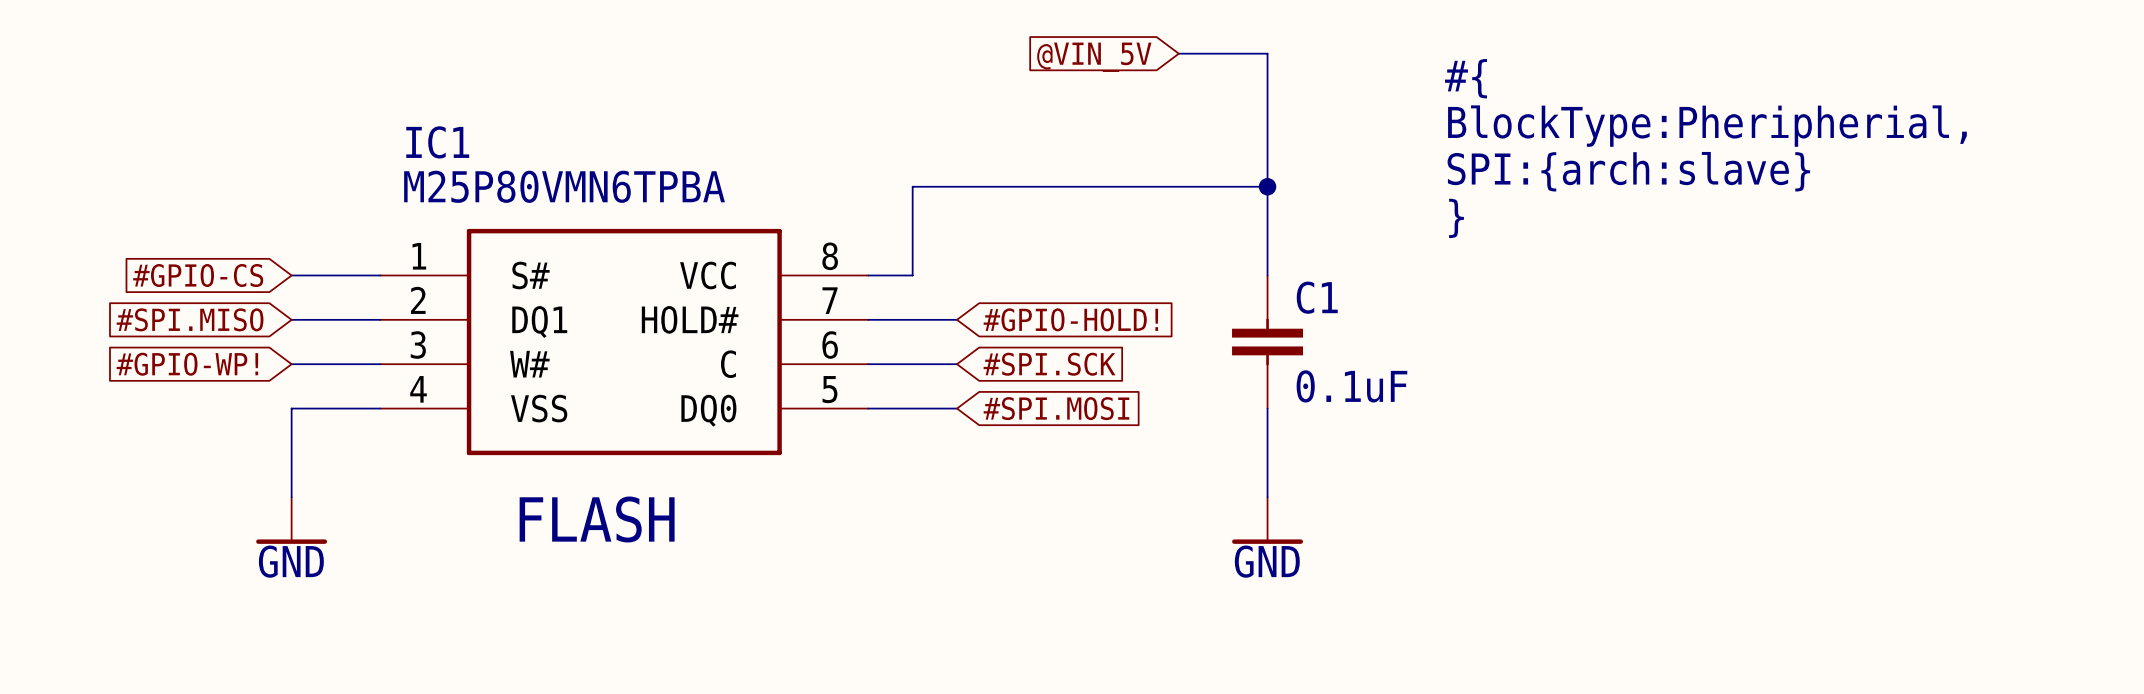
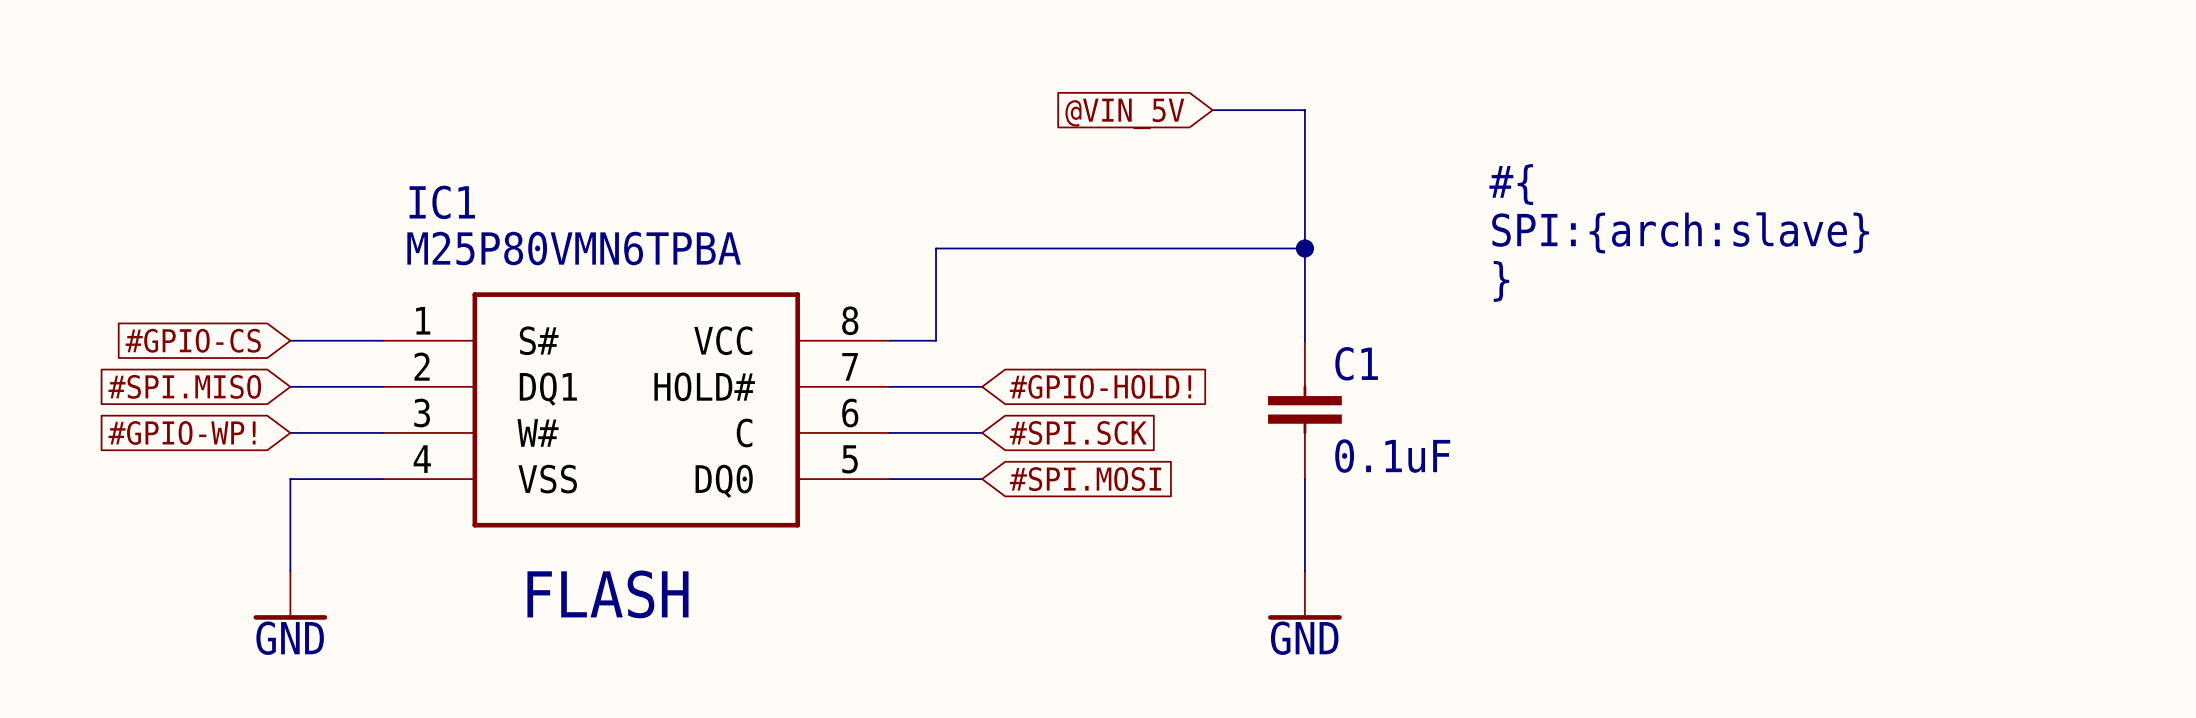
text: #{ (1466, 78) -> none
text: BlockType:Pheripherial, (1707, 126) -> #{ (1511, 184)

